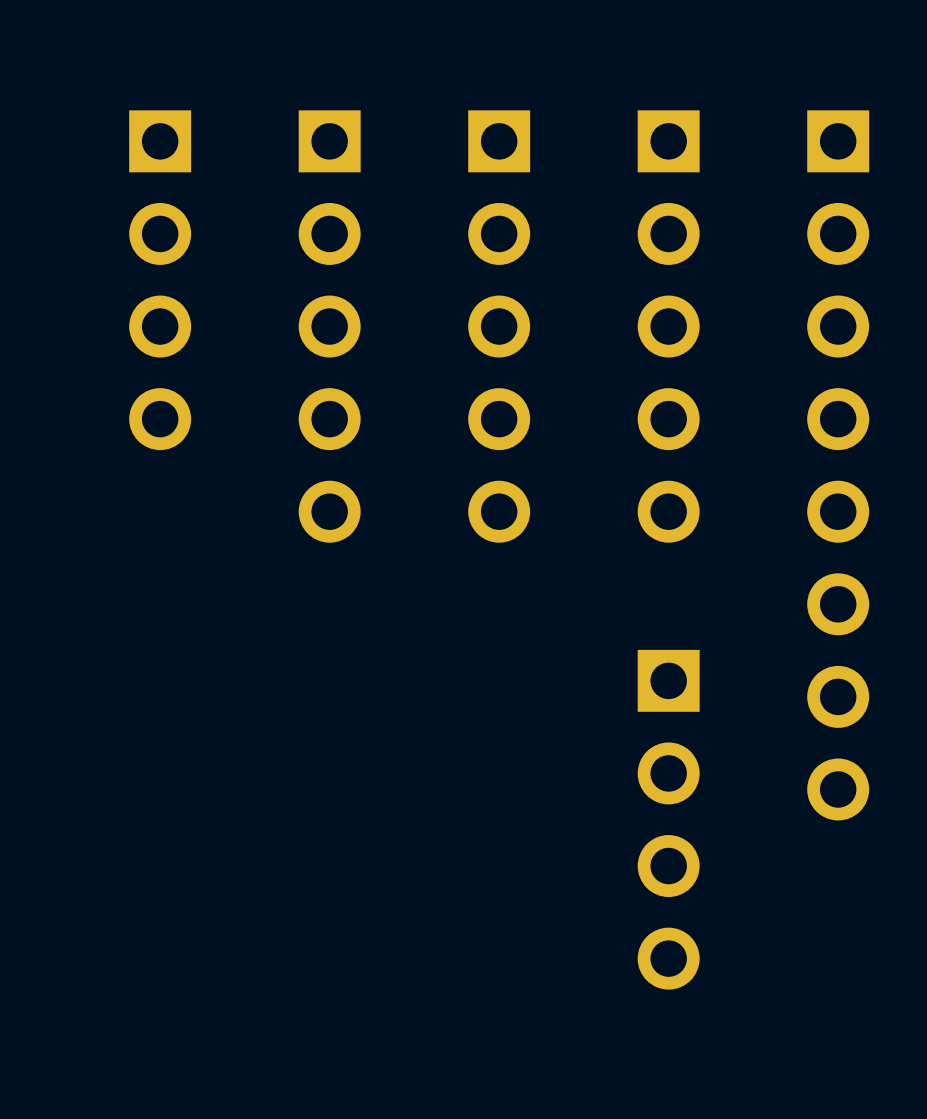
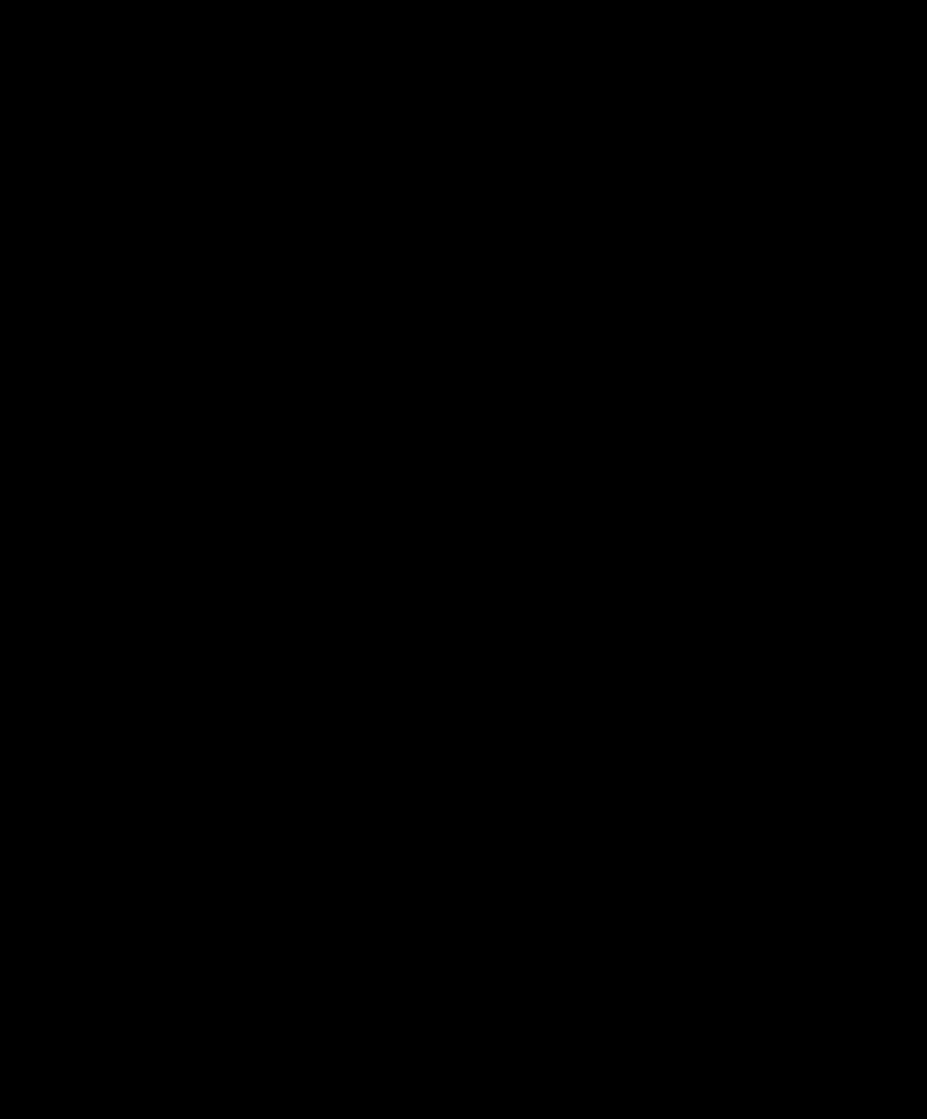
part: (160, 280) -> none
part: (329, 326) -> none
part: (499, 326) -> none
part: (668, 326) -> none
part: (838, 465) -> none
part: (668, 819) -> none

